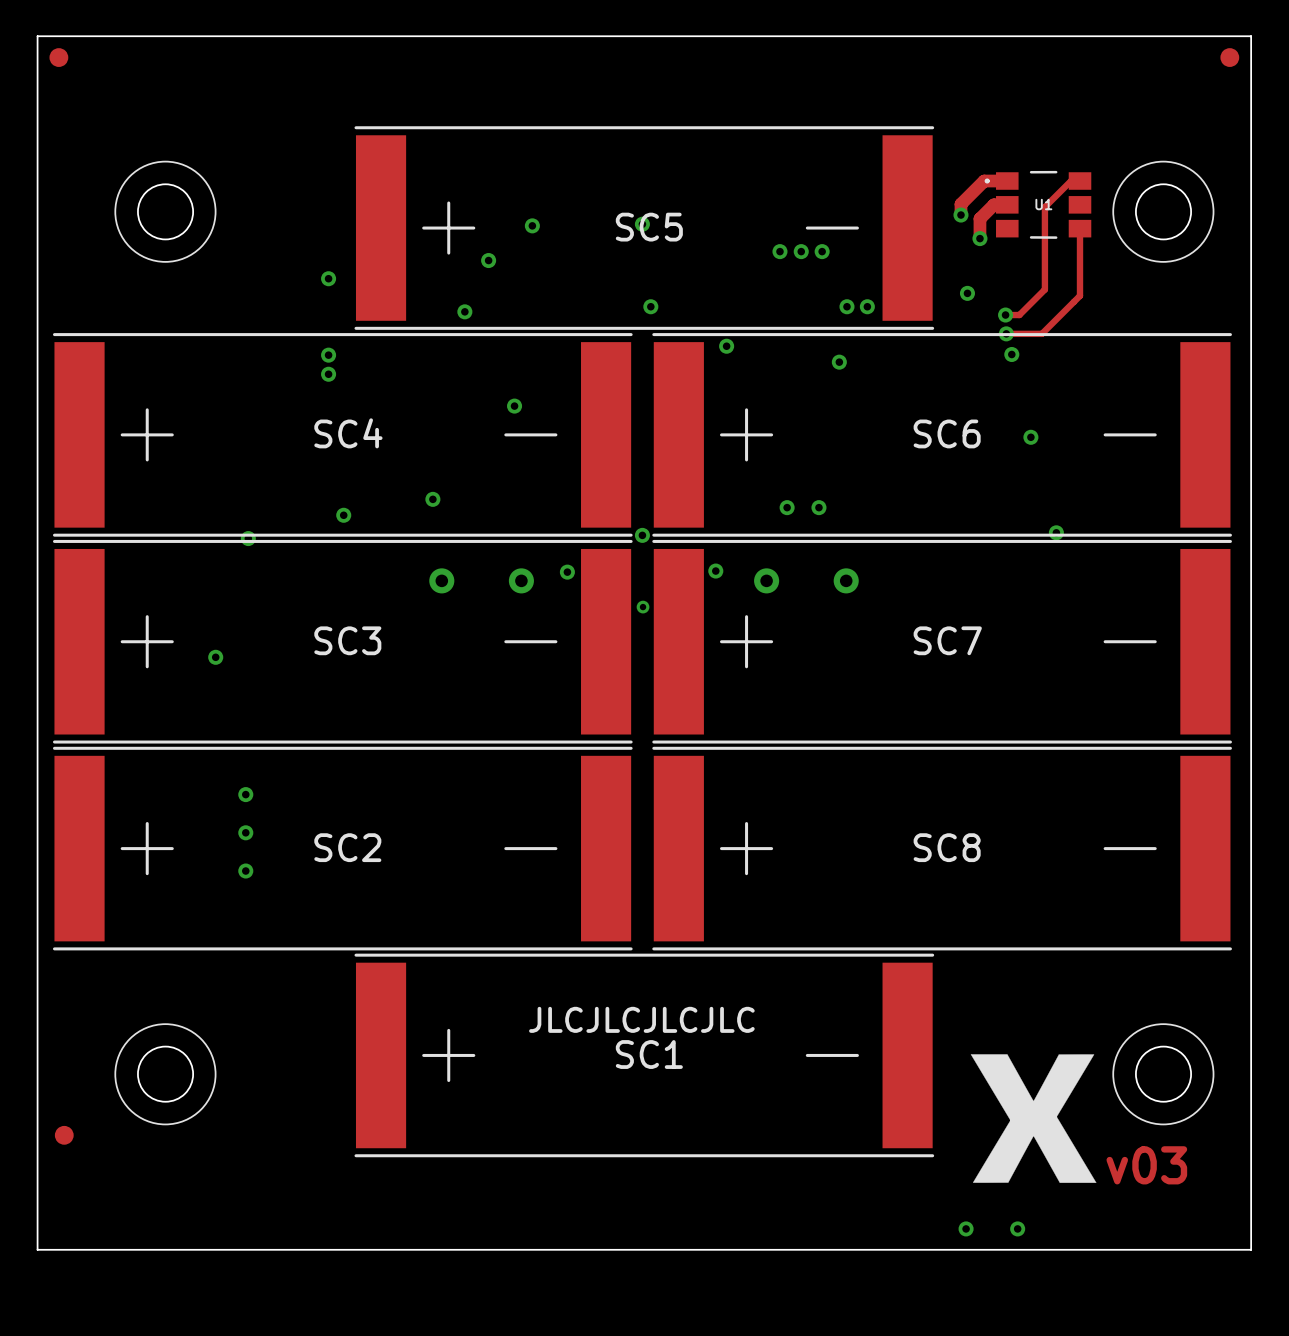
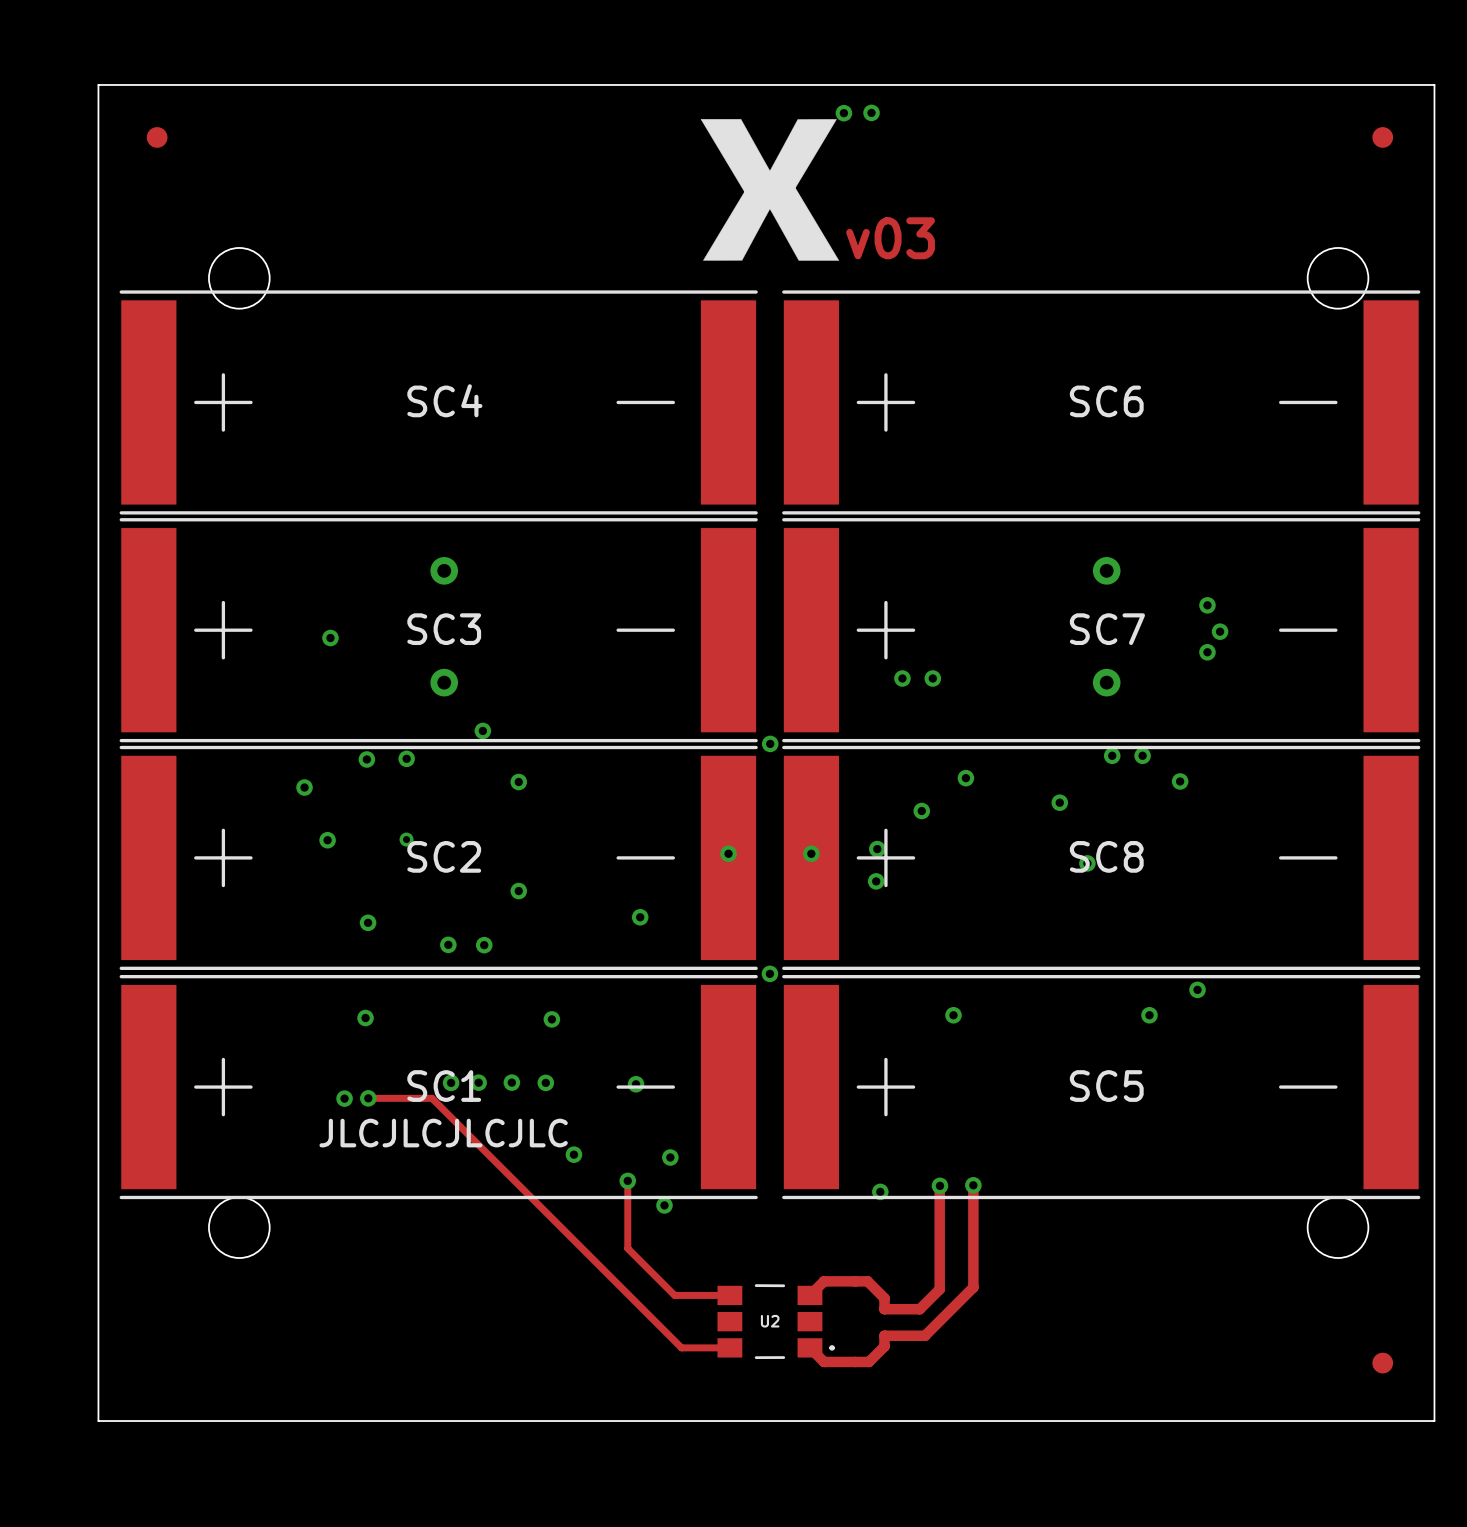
part position: (58, 57) -> (157, 137)
part position: (1229, 57) -> (1382, 137)
via: none -> (843, 113)
via: none -> (871, 112)
drawing: none -> [700, 119, 840, 261]
drawing: [114, 160, 217, 263] -> none
drawing: [1112, 160, 1215, 263] -> none
text: none -> v03 (890, 238)
track: (1007, 181) (984, 181) (960, 204) (960, 215) -> none
track: (1080, 181) (1071, 181) (1044, 207) (1044, 289) (1019, 315) (1005, 315) -> none
track: (1007, 204) (993, 204) (979, 218) (979, 238) -> none
U1: (1038, 204) -> none
via: (960, 215) -> none
via: (642, 224) -> none
via: (532, 225) -> none
SC5 position: (644, 228) -> (1101, 1087)
track: (1080, 228) (1080, 295) (1041, 333) (1006, 333) -> none
via: (979, 238) -> none
via: (779, 251) -> none
via: (801, 251) -> none
via: (822, 251) -> none
via: (488, 260) -> none
via: (328, 278) -> none
via: (967, 293) -> none
via: (650, 306) -> none
via: (846, 306) -> none
via: (867, 306) -> none
via: (464, 311) -> none
via: (1005, 315) -> none
via: (1006, 333) -> none
via: (726, 346) -> none
via: (1011, 354) -> none
via: (328, 355) -> none
via: (839, 362) -> none
via: (328, 374) -> none
via: (514, 406) -> none
SC4 position: (342, 434) -> (438, 402)
SC6 position: (942, 434) -> (1101, 402)
via: (1030, 437) -> none
part: none -> (444, 570)
part: none -> (1106, 570)
via: (432, 499) -> none
via: (787, 507) -> none
via: (818, 507) -> none
via: none -> (1207, 605)
via: (343, 515) -> none
via: (642, 535) -> none
via: none -> (1207, 652)
via: (715, 571) -> none
via: (567, 572) -> none
via: none -> (902, 678)
via: none -> (932, 678)
part: none -> (444, 682)
part: none -> (1106, 682)
part: (441, 580) -> none
part: (521, 580) -> none
part: (766, 580) -> none
part: (846, 580) -> none
via: (643, 607) -> none
via: none -> (482, 730)
via: none -> (770, 743)
SC3 position: (342, 641) -> (438, 630)
SC7 position: (942, 641) -> (1101, 630)
via: none -> (1112, 755)
via: none -> (1142, 755)
via: none -> (366, 759)
via: none -> (406, 758)
via position: (215, 657) -> (304, 787)
via: none -> (965, 778)
via: none -> (1180, 781)
via: none -> (518, 782)
via: none -> (1059, 802)
via: none -> (921, 810)
via: none -> (406, 839)
via: none -> (327, 840)
via: none -> (877, 849)
via: none -> (728, 853)
via: none -> (811, 853)
via: none -> (1087, 863)
via: none -> (876, 881)
via: none -> (518, 891)
via: none -> (640, 917)
via: (245, 794) -> none
via: none -> (368, 922)
via: none -> (448, 944)
via: none -> (484, 945)
via: (245, 832) -> none
via: none -> (769, 973)
SC2 position: (342, 848) -> (438, 857)
SC8 position: (942, 848) -> (1101, 857)
via: none -> (1197, 989)
via: (245, 871) -> none
via: none -> (953, 1015)
via: none -> (1149, 1015)
via: none -> (365, 1018)
via: none -> (551, 1019)
via: none -> (451, 1082)
via: none -> (478, 1082)
via: none -> (511, 1082)
via: none -> (545, 1082)
via: none -> (636, 1084)
via: none -> (344, 1098)
track: none -> (368, 1098) (432, 1098) (681, 1347) (729, 1347)
via: none -> (368, 1098)
via: none -> (573, 1154)
via: none -> (670, 1157)
text position: JLCJLCJLCJLC (641, 1019) -> JLCJLCJLCJLC (443, 1133)
drawing: [114, 1023, 217, 1126] -> none
drawing: [970, 1023, 1215, 1183] -> none
track: none -> (627, 1180) (627, 1248) (674, 1295) (729, 1295)
via: none -> (627, 1180)
track: none -> (973, 1185) (973, 1287) (925, 1335) (884, 1335) (884, 1346) (869, 1361) (824, 1361) (809, 1347)
via: none -> (973, 1185)
track: none -> (939, 1186) (939, 1289) (919, 1309) (884, 1309) (884, 1298) (867, 1281) (824, 1281) (809, 1295)
via: none -> (939, 1185)
via: none -> (880, 1191)
via: none -> (664, 1205)
SC1 position: (644, 1055) -> (438, 1087)
part: (64, 1135) -> none
U2: none -> (776, 1321)
text: v03 (1146, 1165) -> none
part: none -> (1382, 1363)
via: (966, 1228) -> none
via: (1017, 1228) -> none

